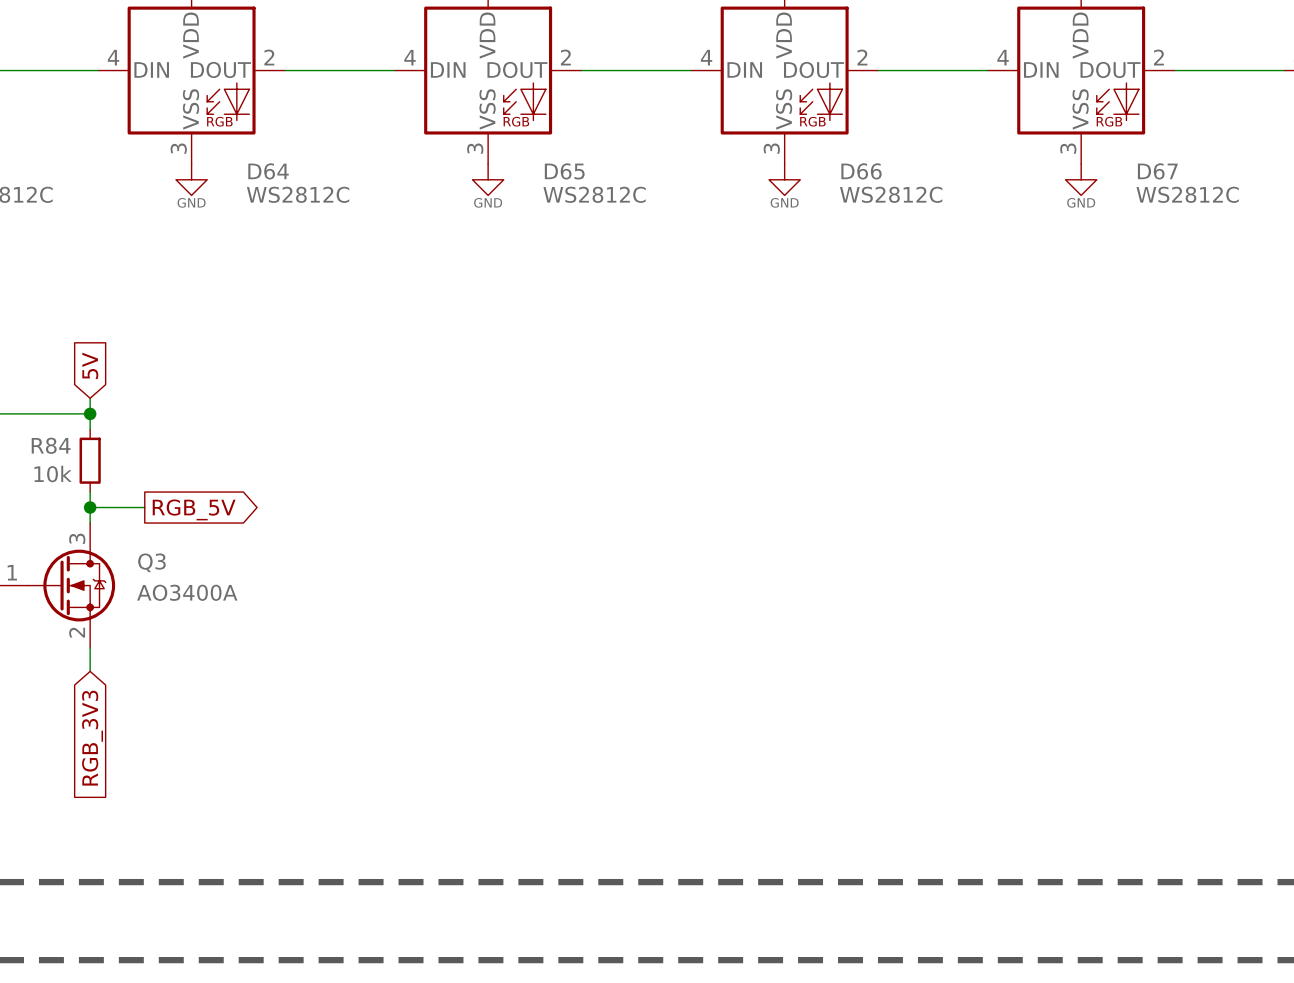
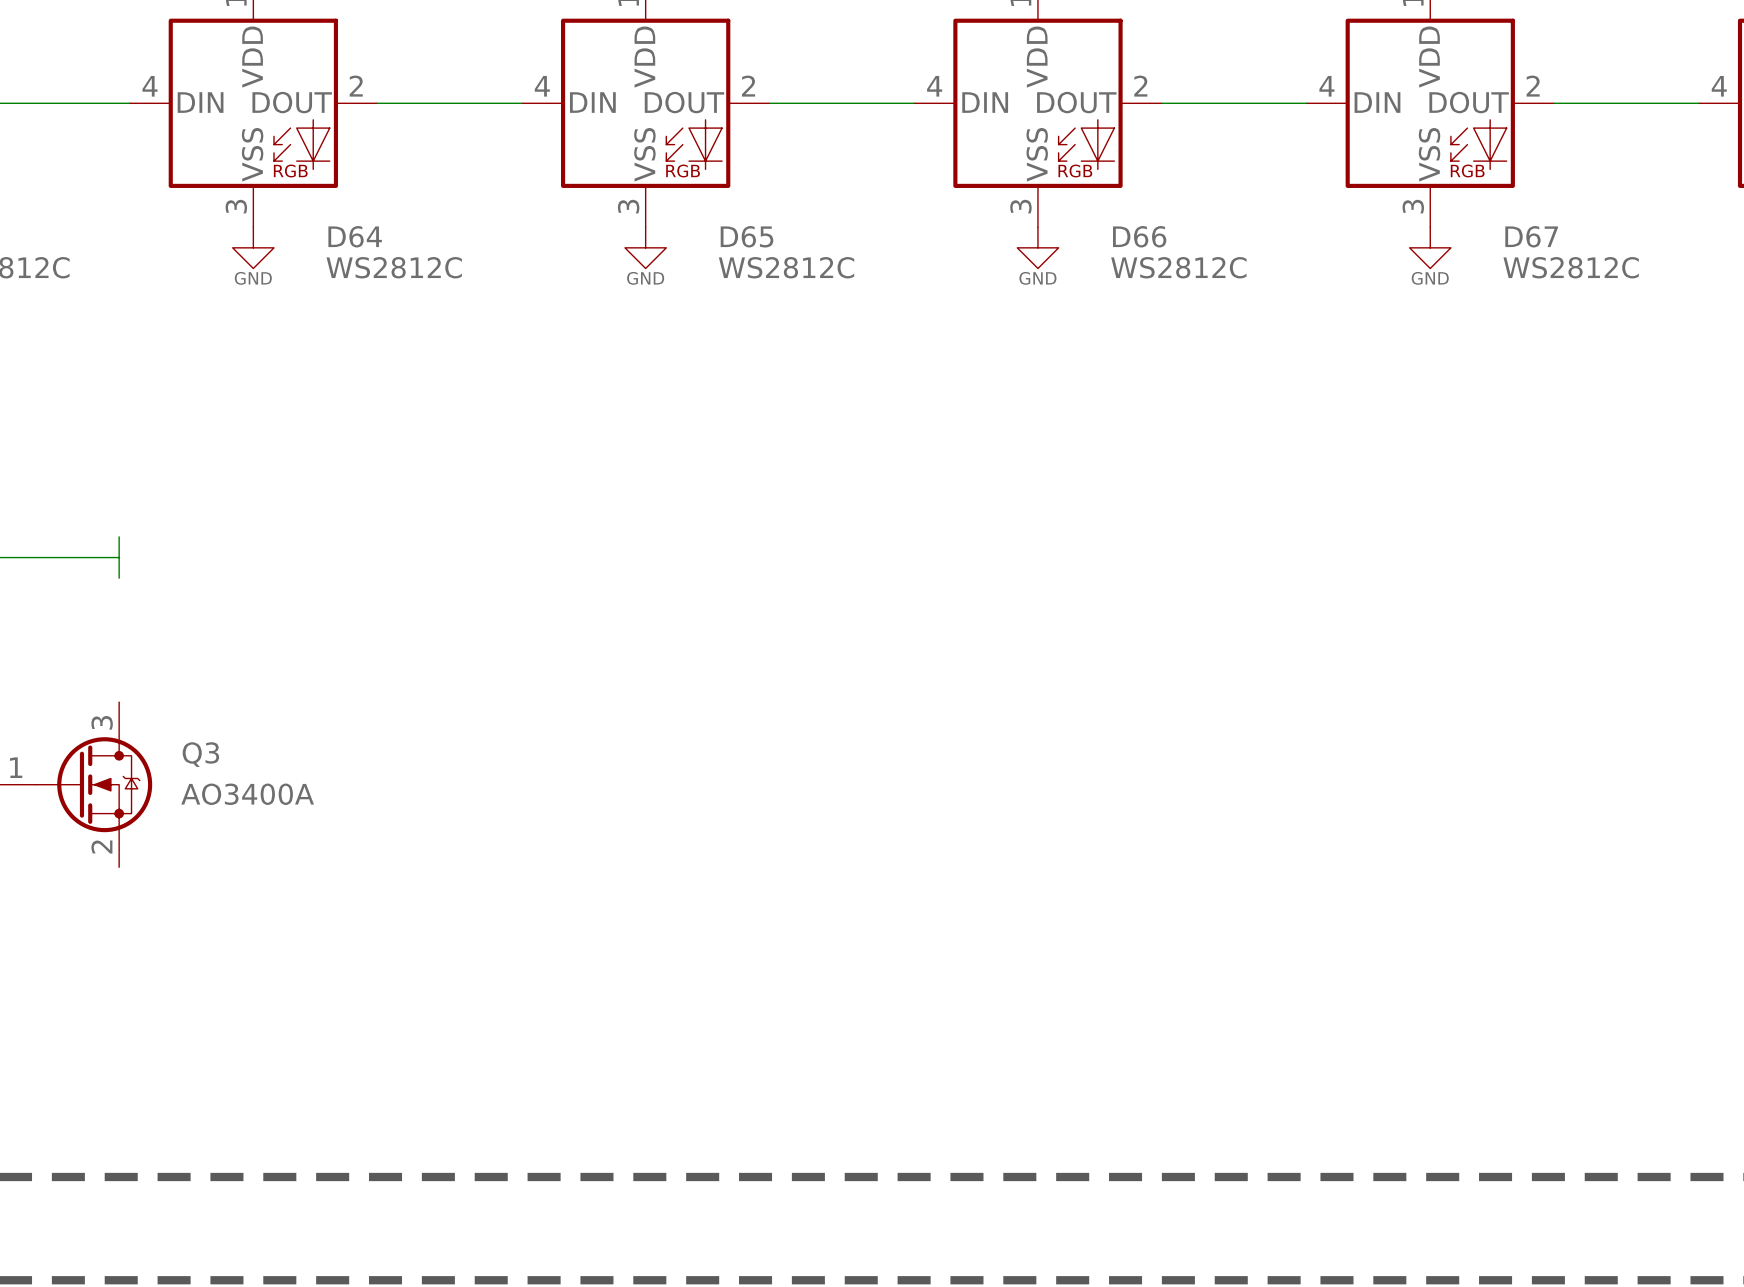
global label: 5V (90, 365) -> none
junction: (90, 413) -> none
R84: 10k (90, 460) -> none
wire: (90, 491) (90, 523) -> none
wire: (90, 507) (144, 507) -> none
junction: (90, 507) -> none
global label: RGB_5V (194, 509) -> none
wire: (90, 647) (90, 671) -> none
global label: RGB_3V3 (92, 738) -> none

